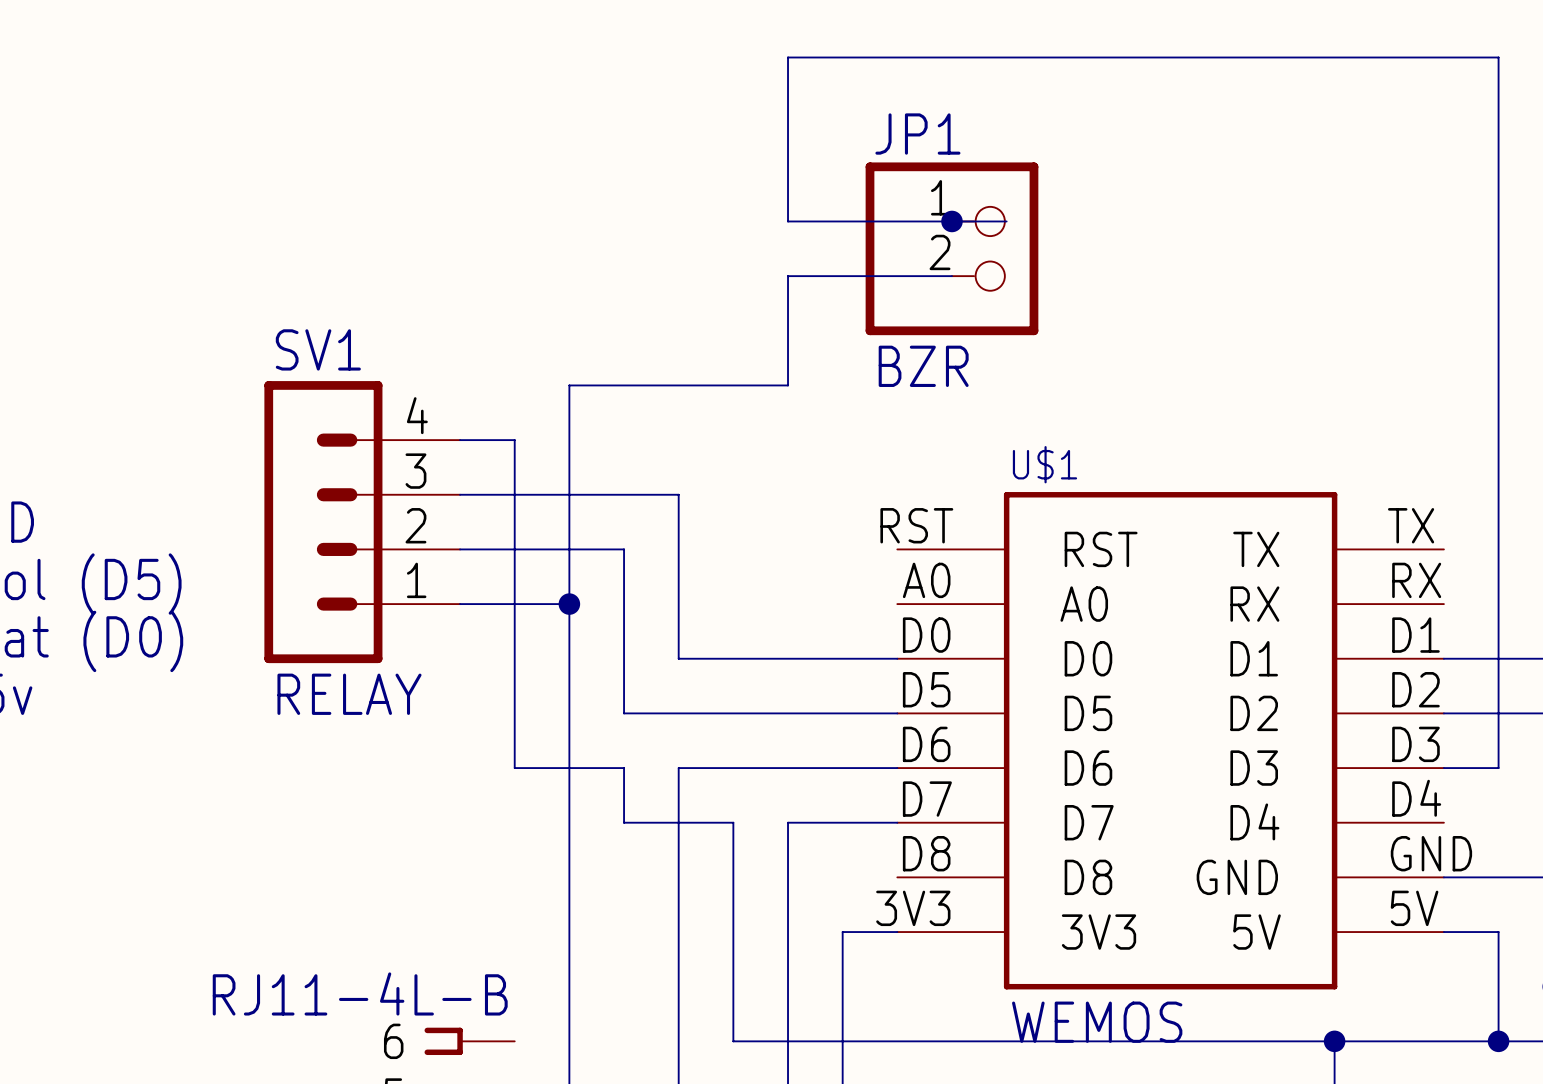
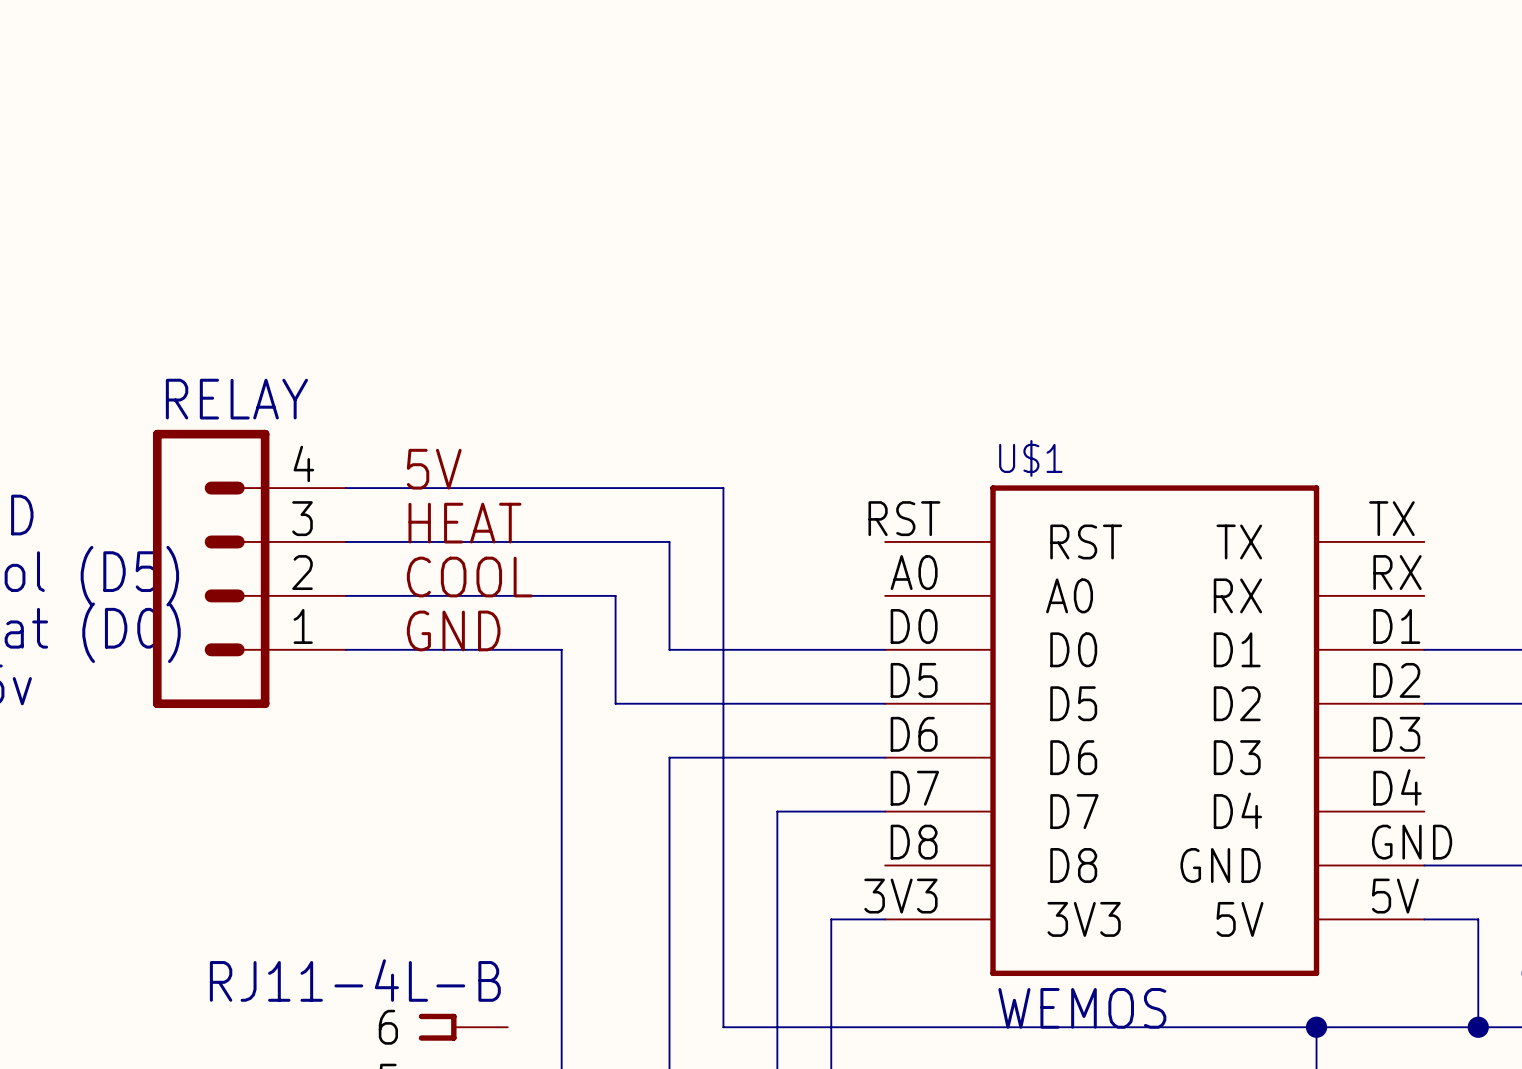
junction: (951, 221) -> none
wire: (1006, 221) (788, 221) (788, 57) (1498, 57) (1498, 768) (1443, 768) -> none
JP1: BZR (951, 248) -> none
wire: (951, 276) (788, 276) (788, 385) (569, 385) (569, 658) -> (345, 649) (561, 649)
wire: (460, 440) (514, 440) (514, 768) (624, 768) (624, 822) (733, 822) -> (669, 488) (723, 488) (723, 811)
label: none -> 5V (434, 469)
wire: (678, 494) (678, 549) -> (615, 541) (669, 541)
SV1: RELAY (362, 522) -> none
label: none -> HEAT (464, 523)
wire: (624, 549) (624, 604) -> (561, 595) (615, 595)
RELAY: none -> (249, 568)
label: none -> COOL (469, 577)
junction: (569, 604) -> none
label: none -> GND (453, 630)

